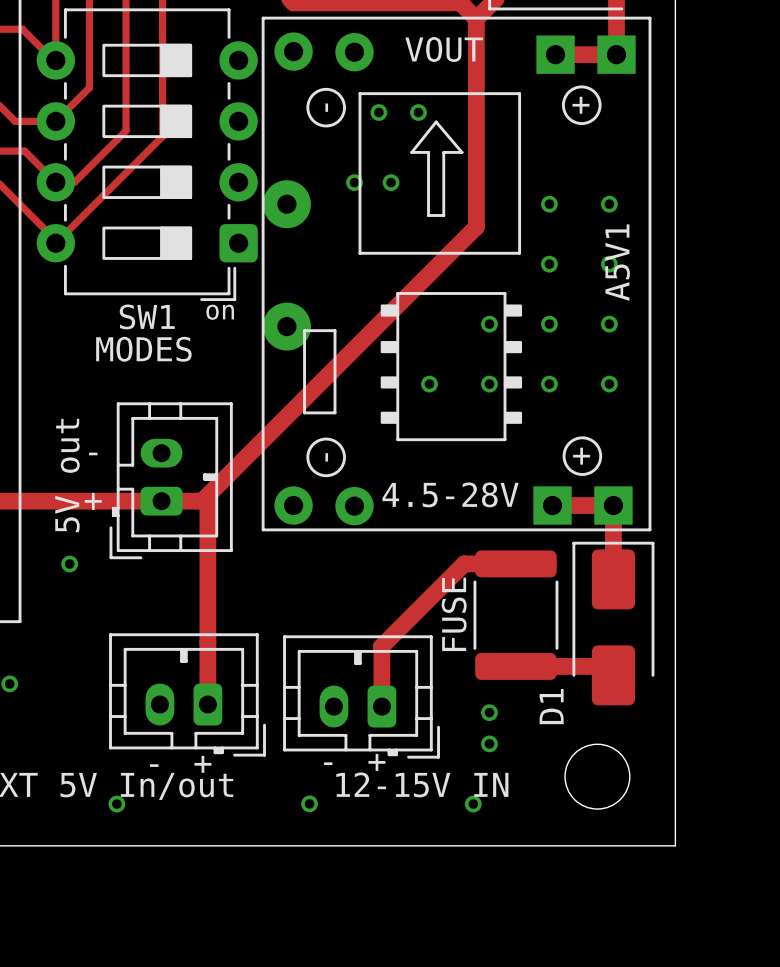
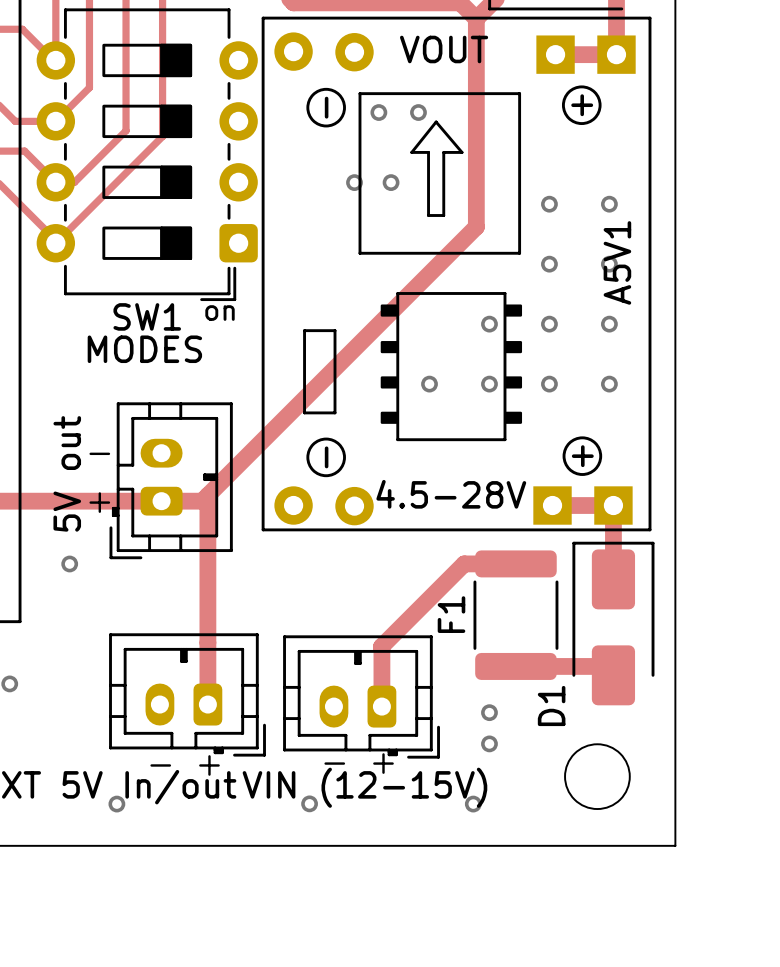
A5V1 footprint: [261, 16, 652, 532] -> [261, 16, 652, 532]
FUSE name: FUSE (454, 614) -> F1 (451, 614)
part value: 12-15V IN (422, 784) -> VIN (12-15V) (364, 787)

